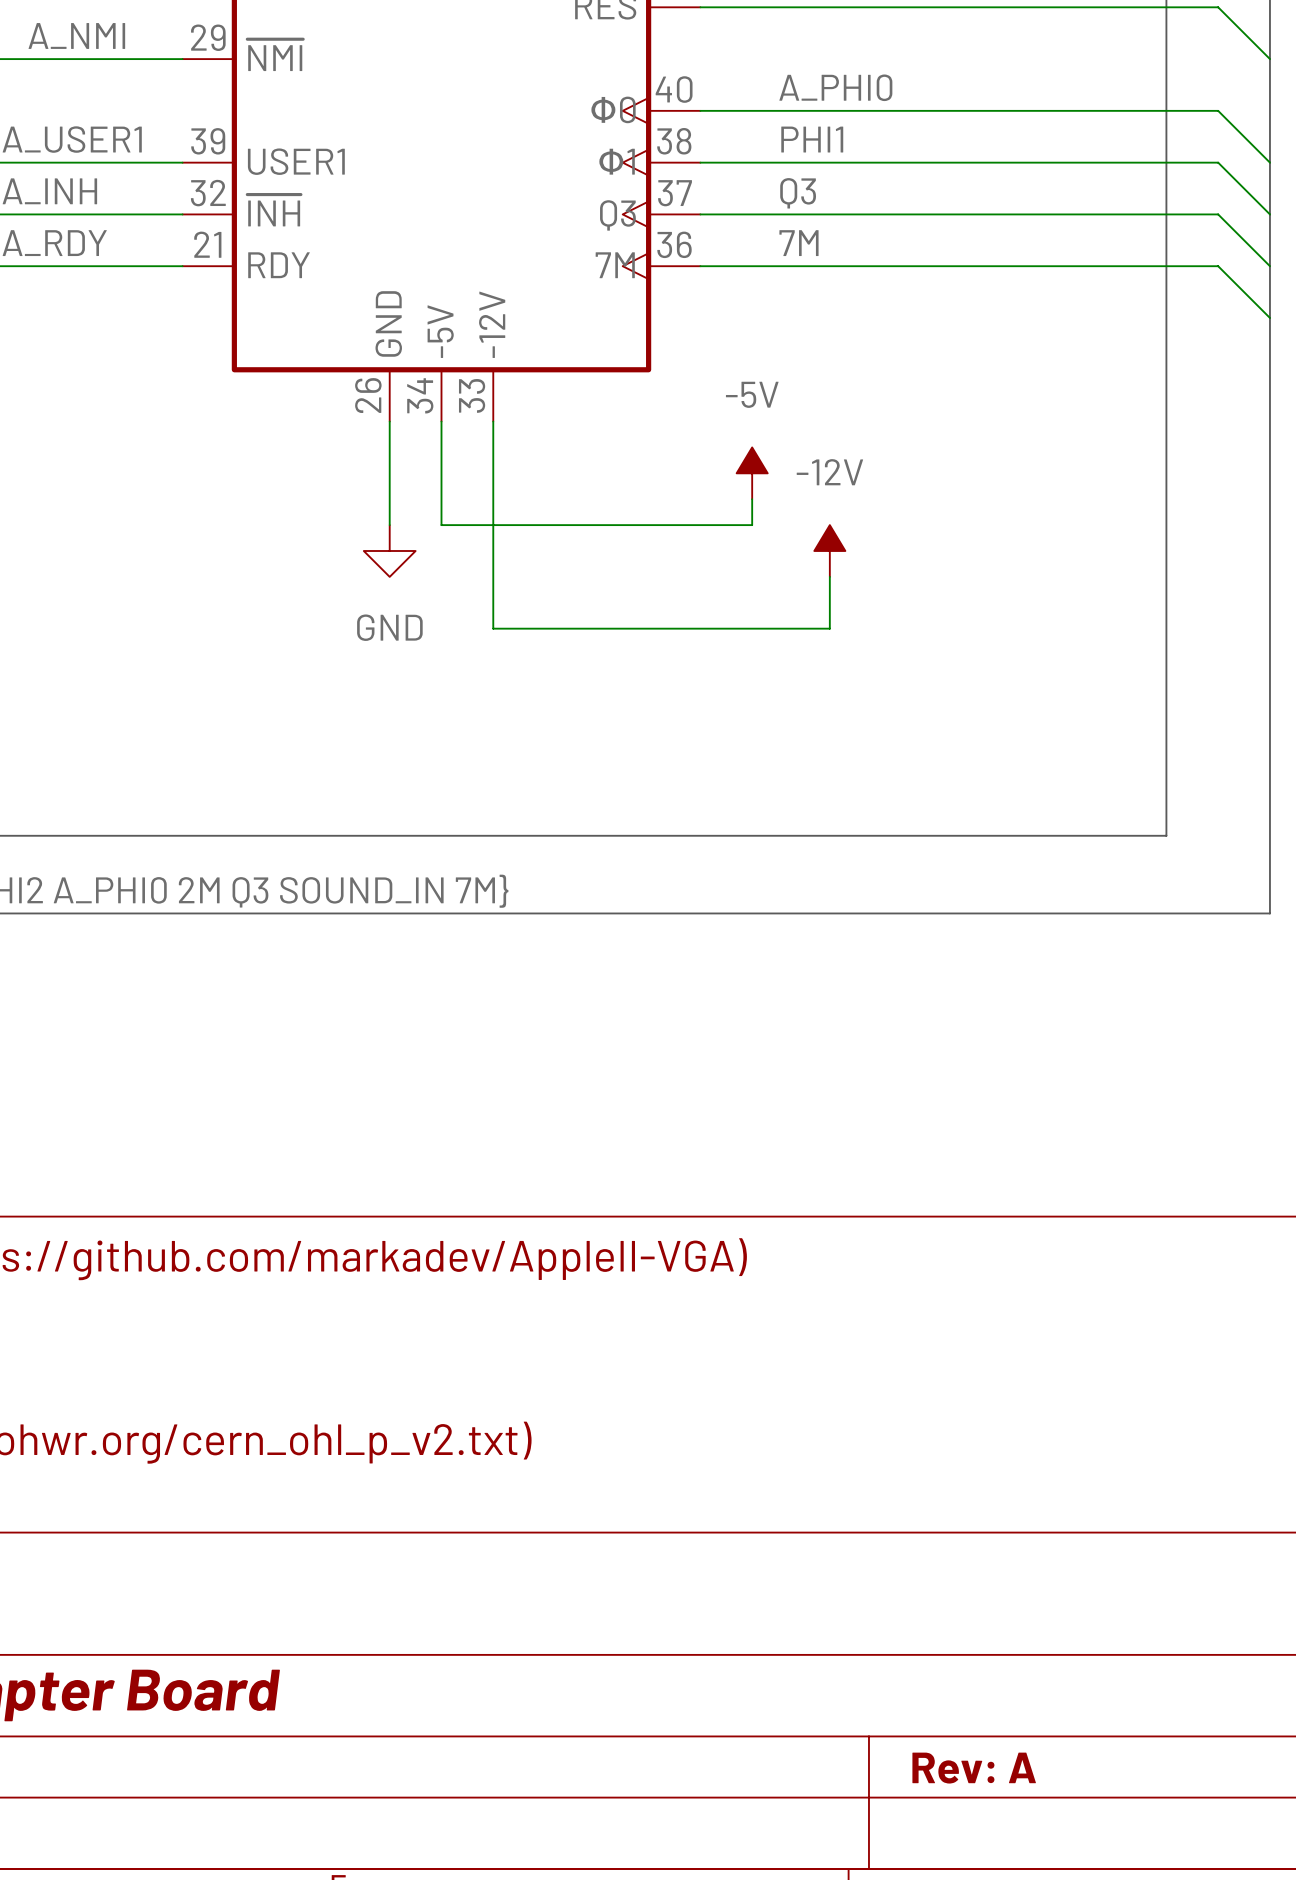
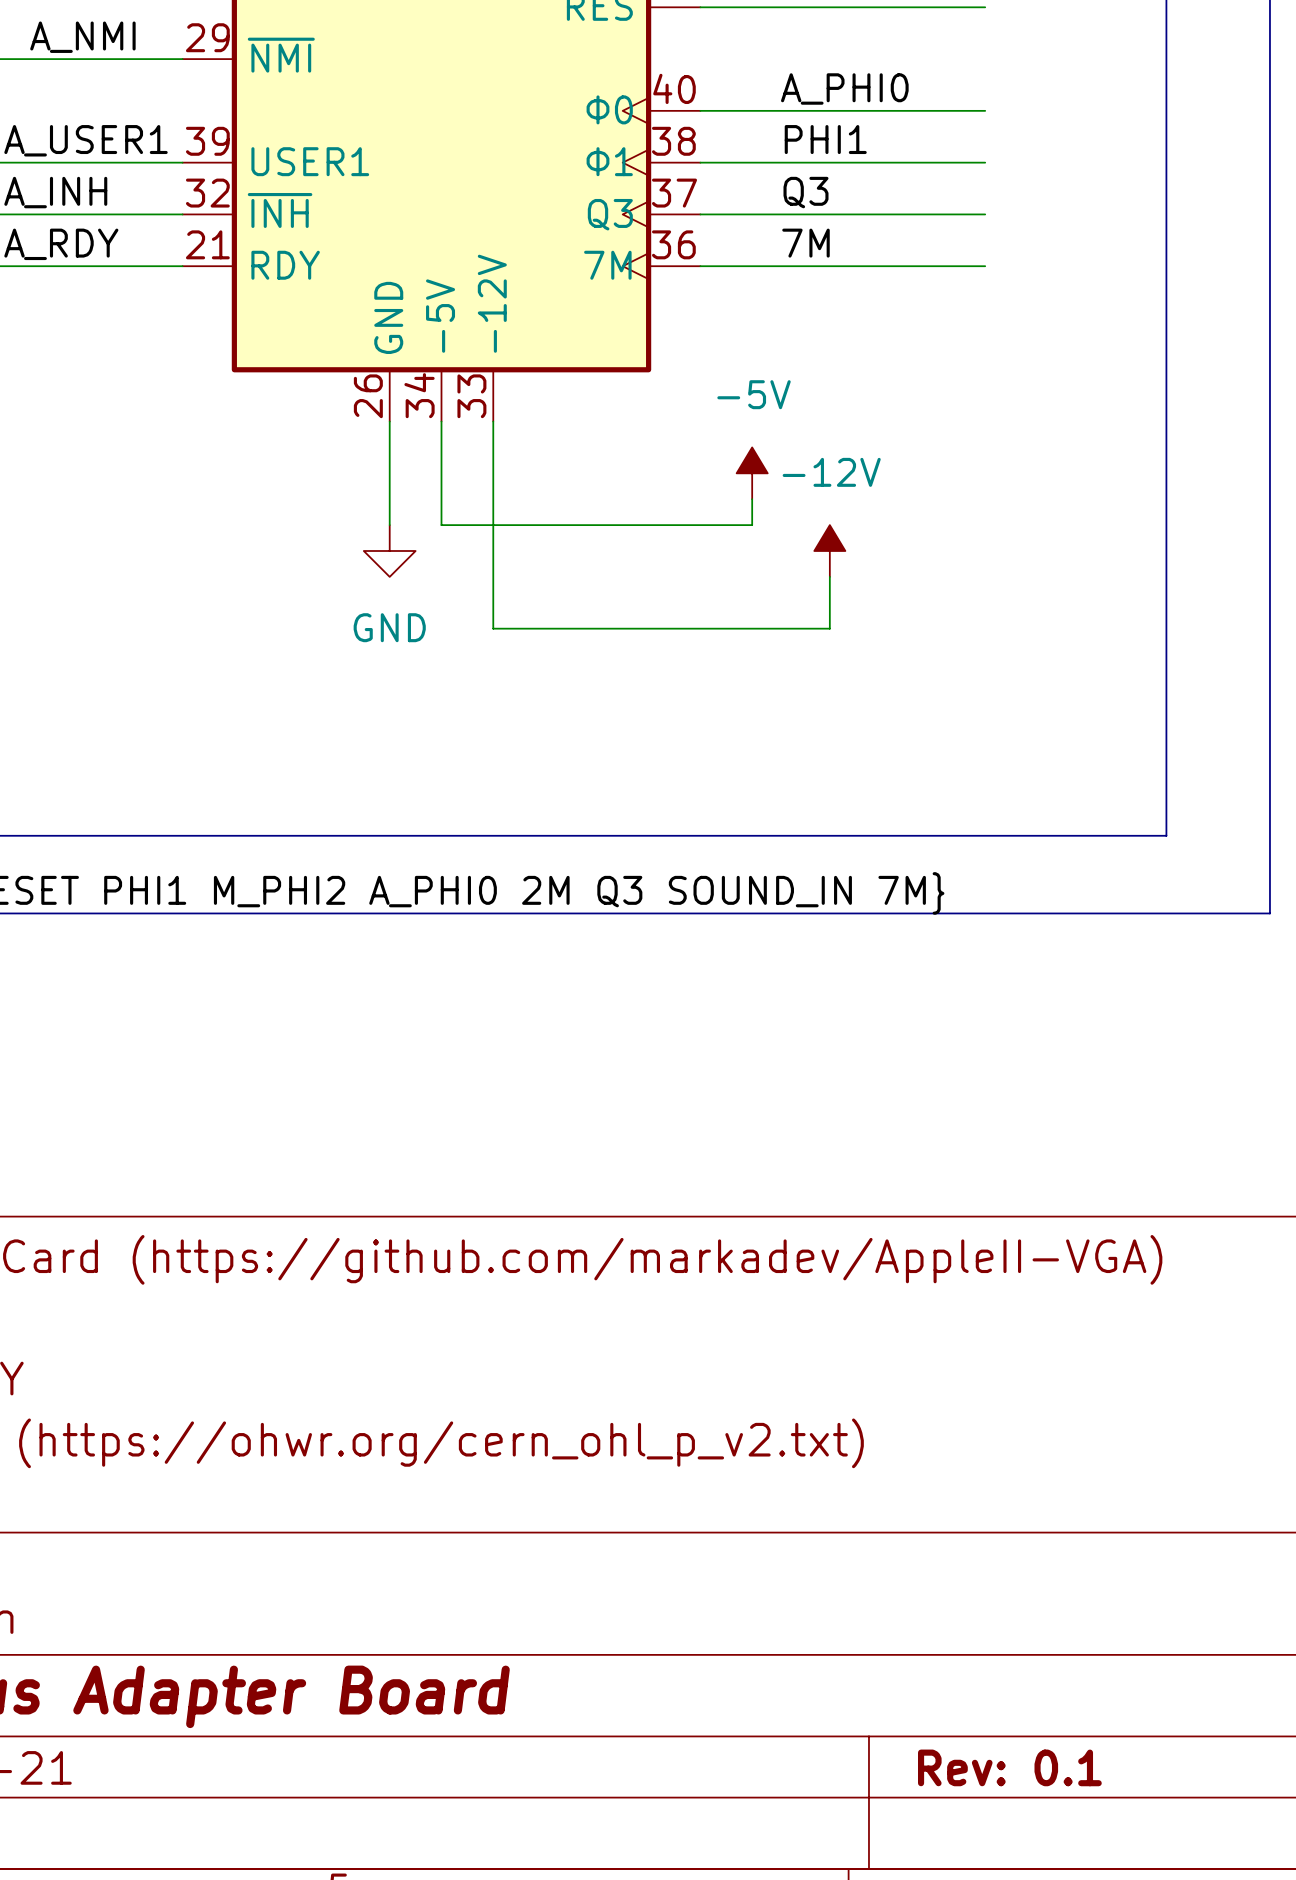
wire: (985, 7) (1218, 7) (1269, 59) -> none
wire: (985, 110) (1218, 110) (1269, 162) -> none
wire: (985, 162) (1218, 162) (1269, 214) -> none
wire: (985, 214) (1218, 214) (1269, 266) -> none
wire: (985, 266) (1218, 266) (1269, 317) -> none
title block: Rev: A (974, 1768) -> Rev: 0.1 (1009, 1767)

